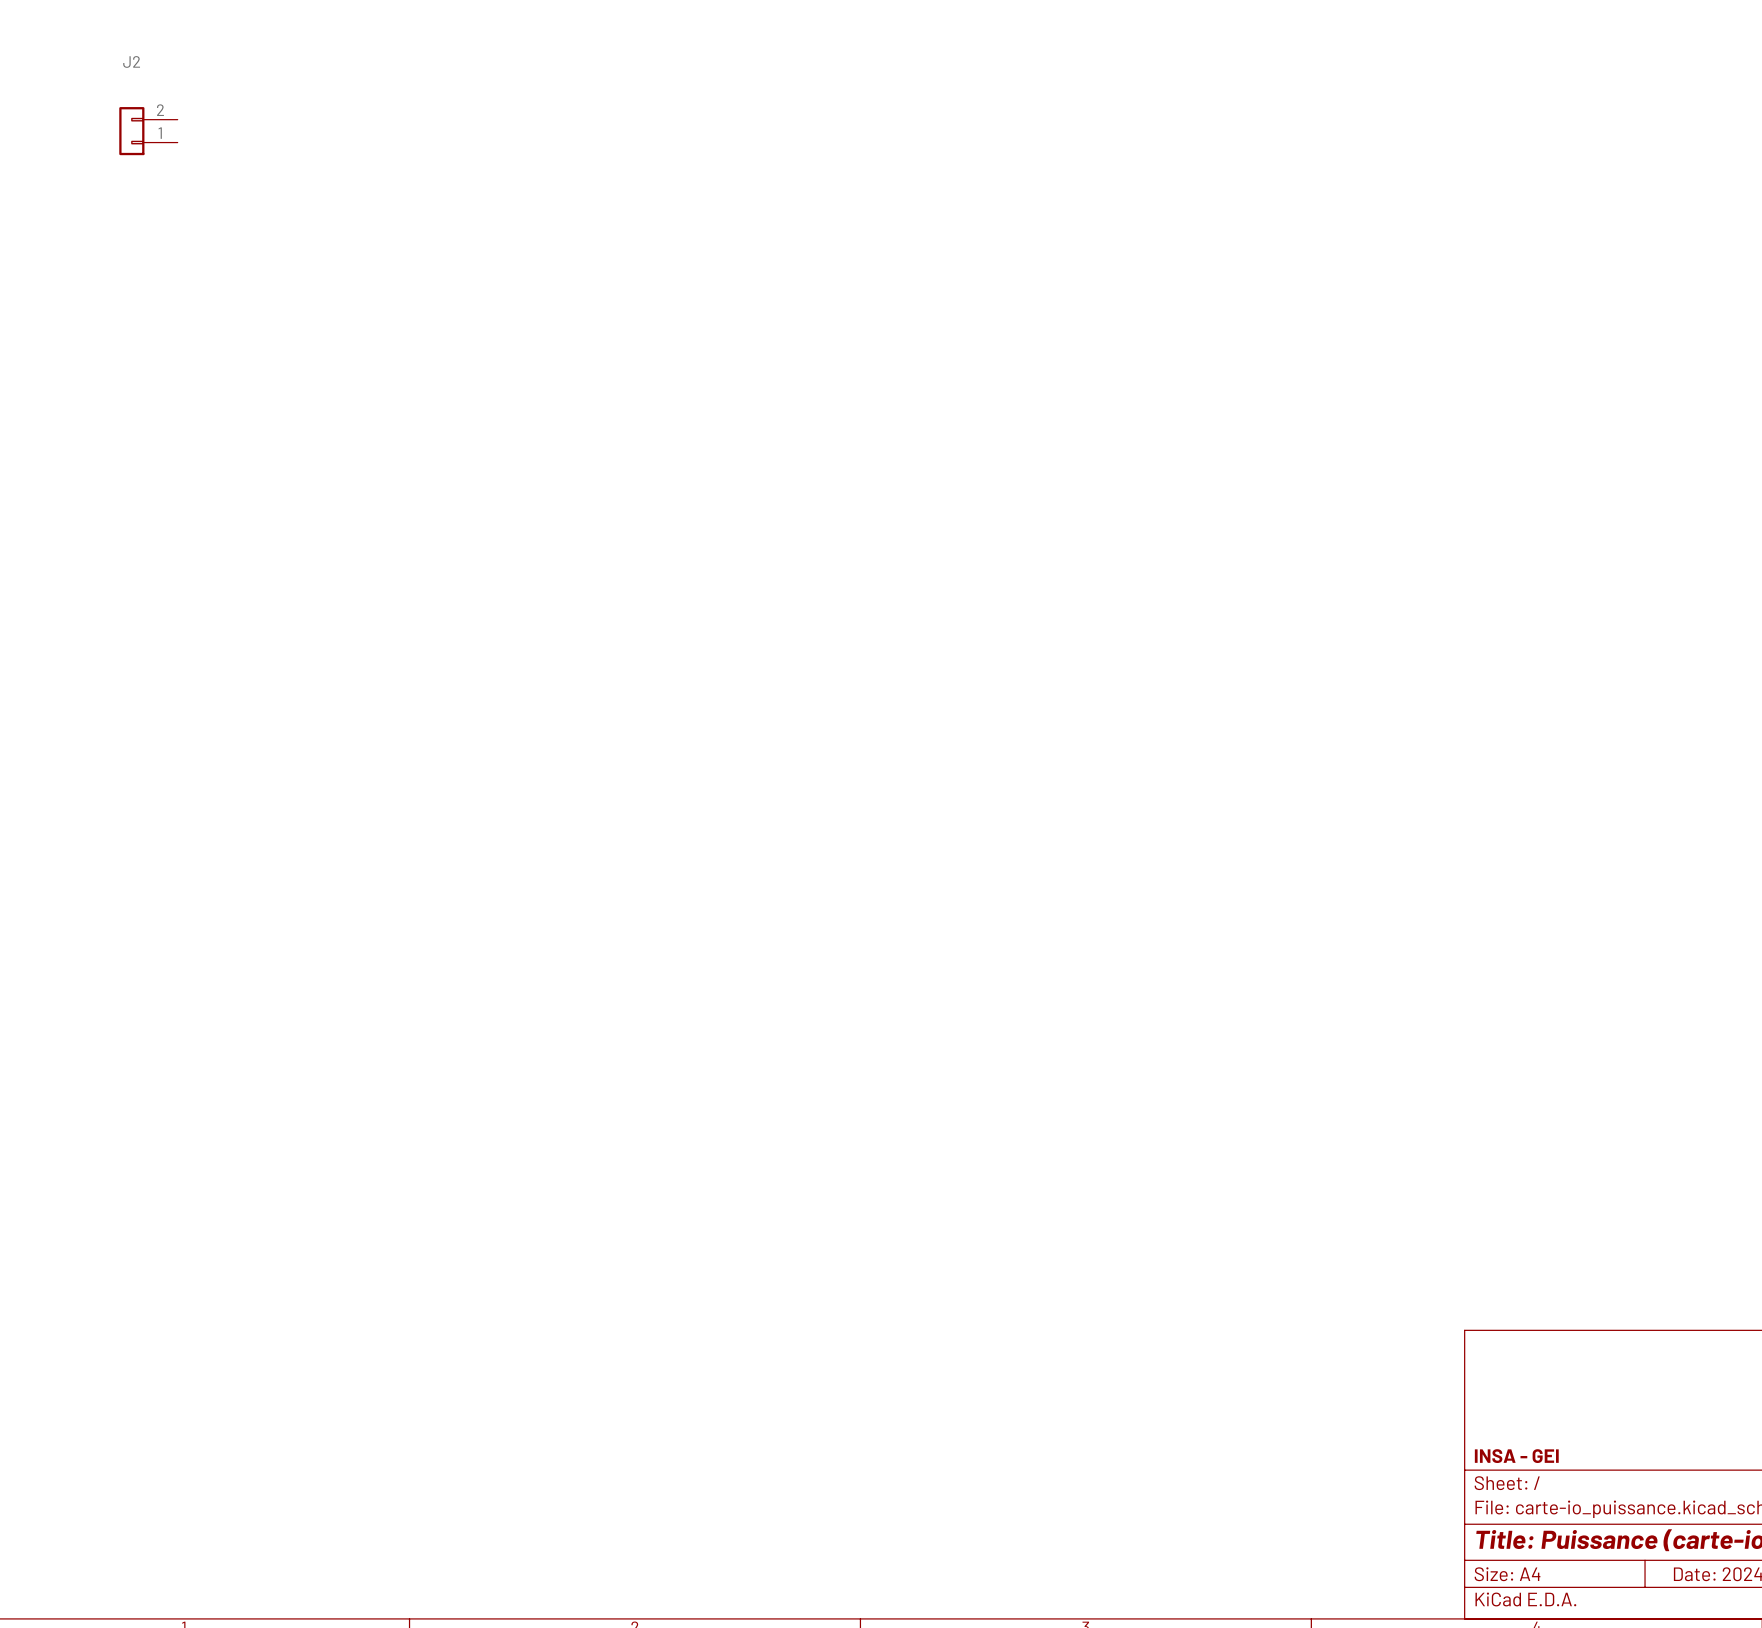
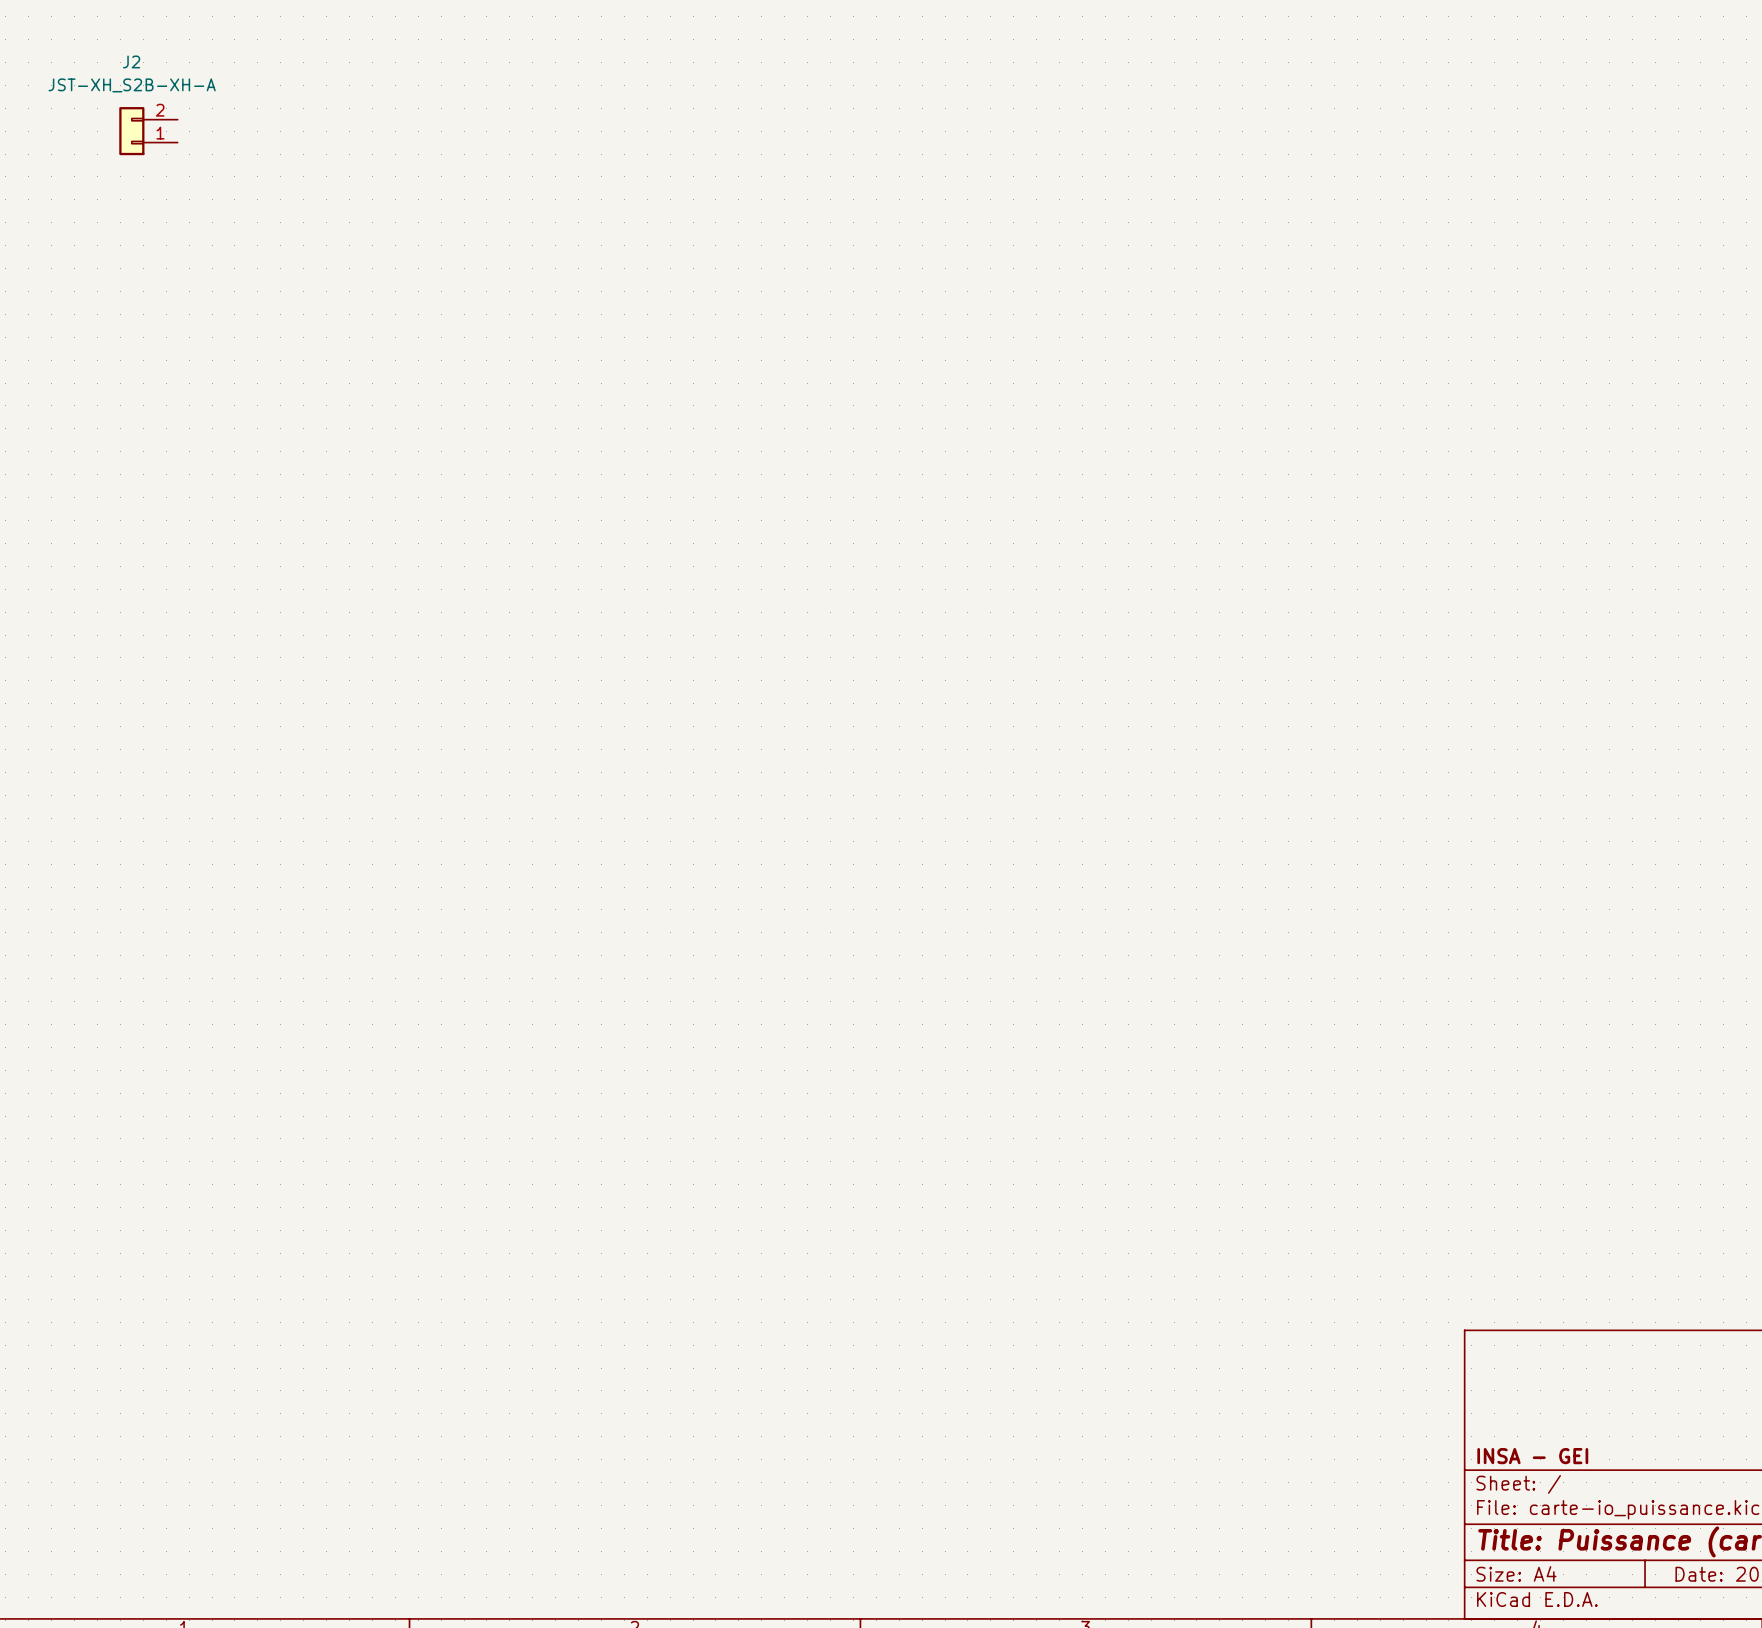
J2 value: none -> JST-XH_S2B-XH-A (132, 85)

